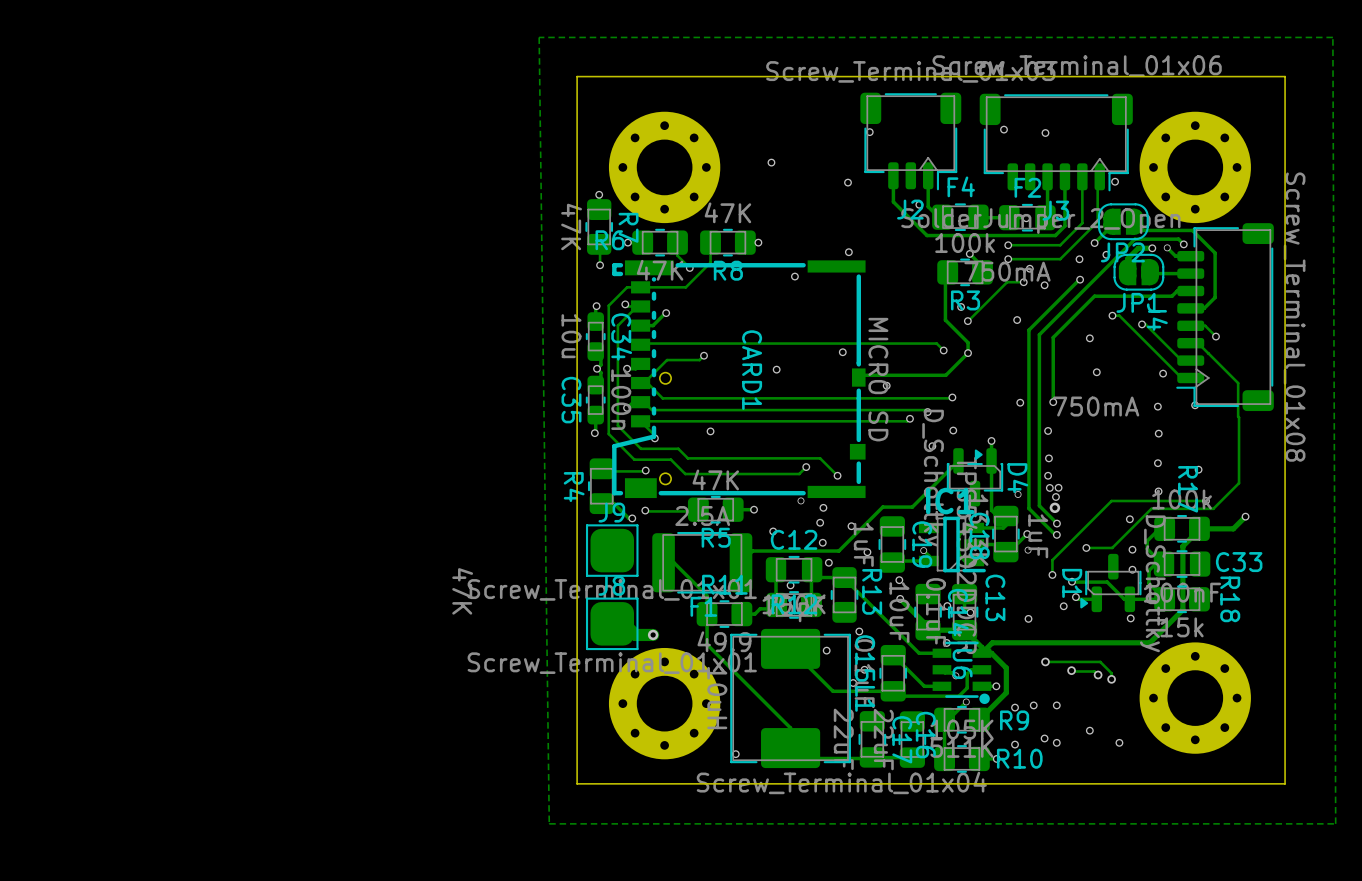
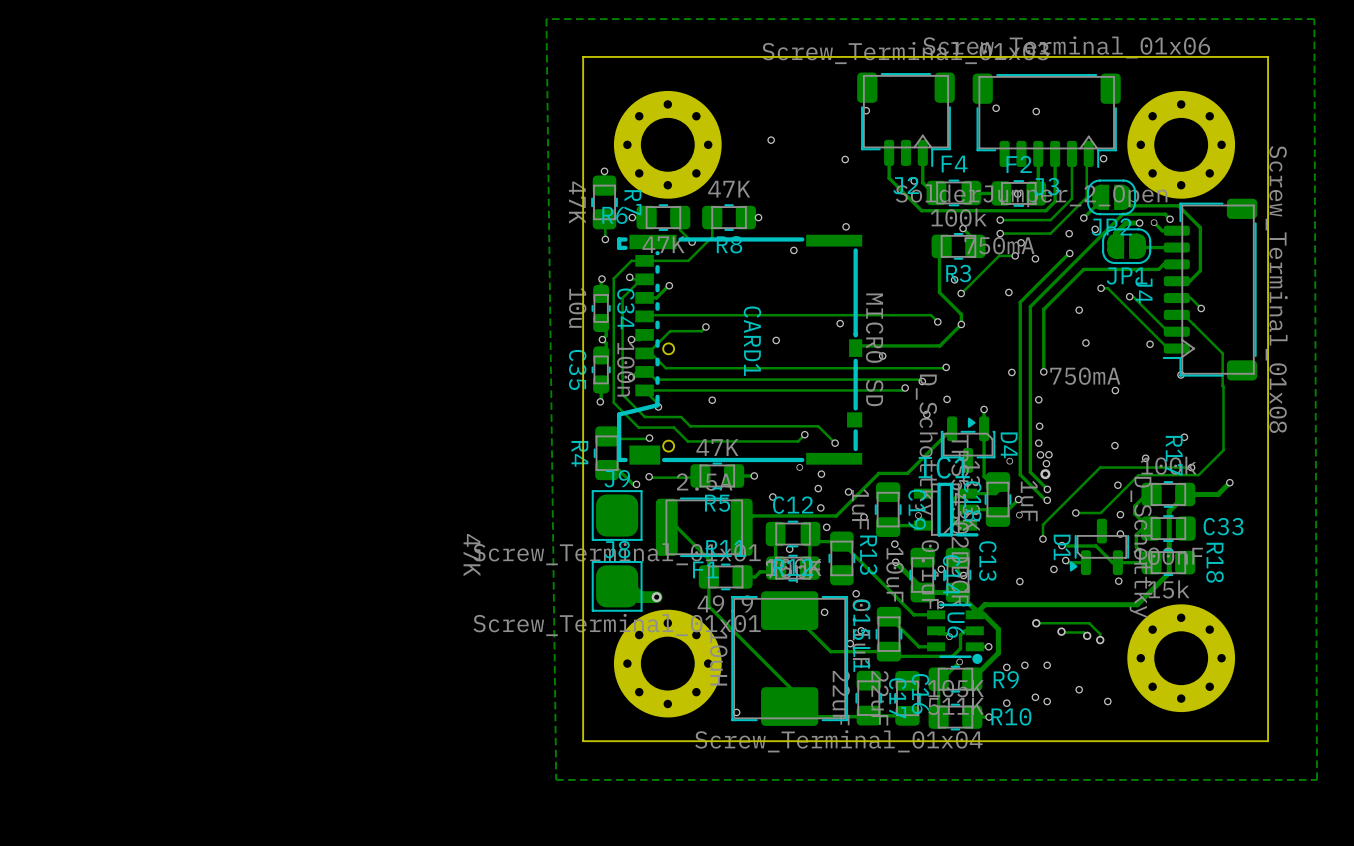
via: (1157, 406) -> none
via: none -> (1115, 390)
via: (1158, 433) -> none
via: (1157, 463) -> none
via: none -> (1114, 445)

